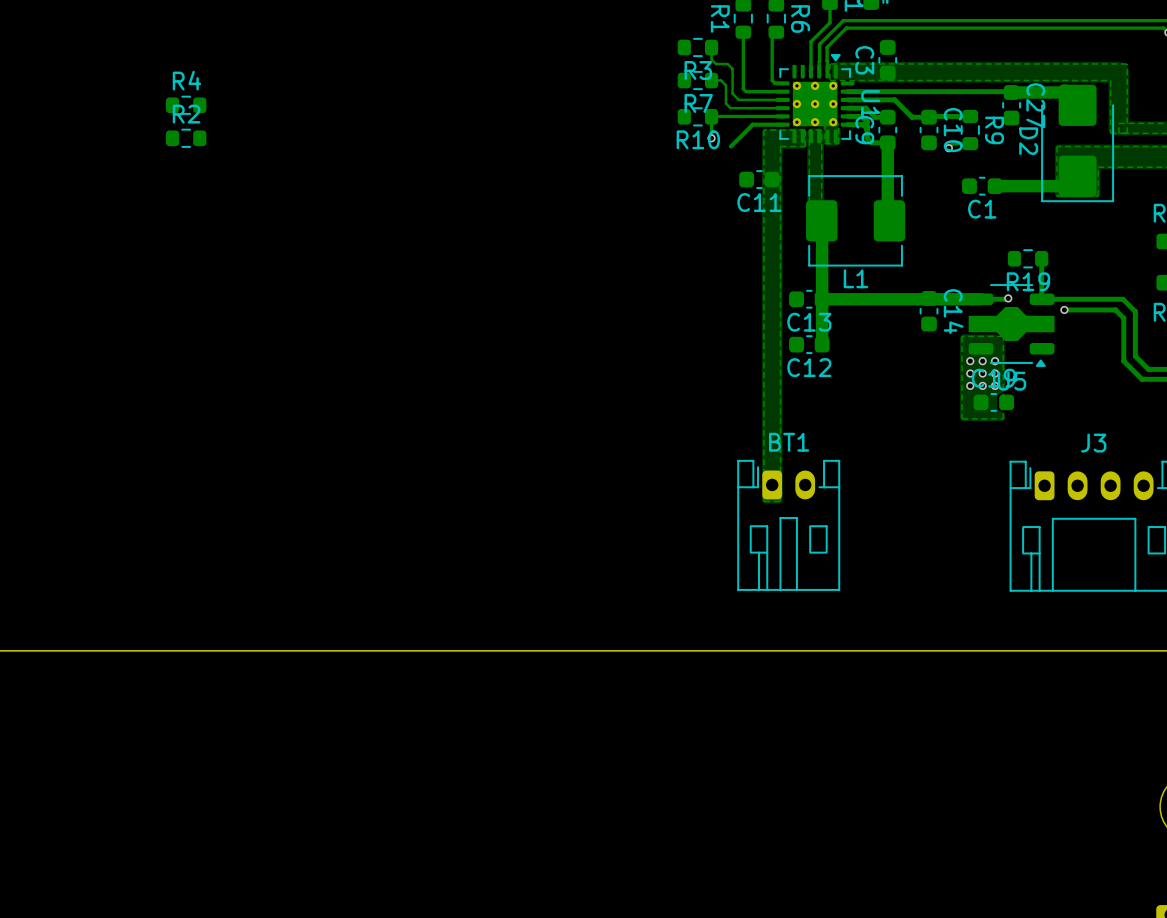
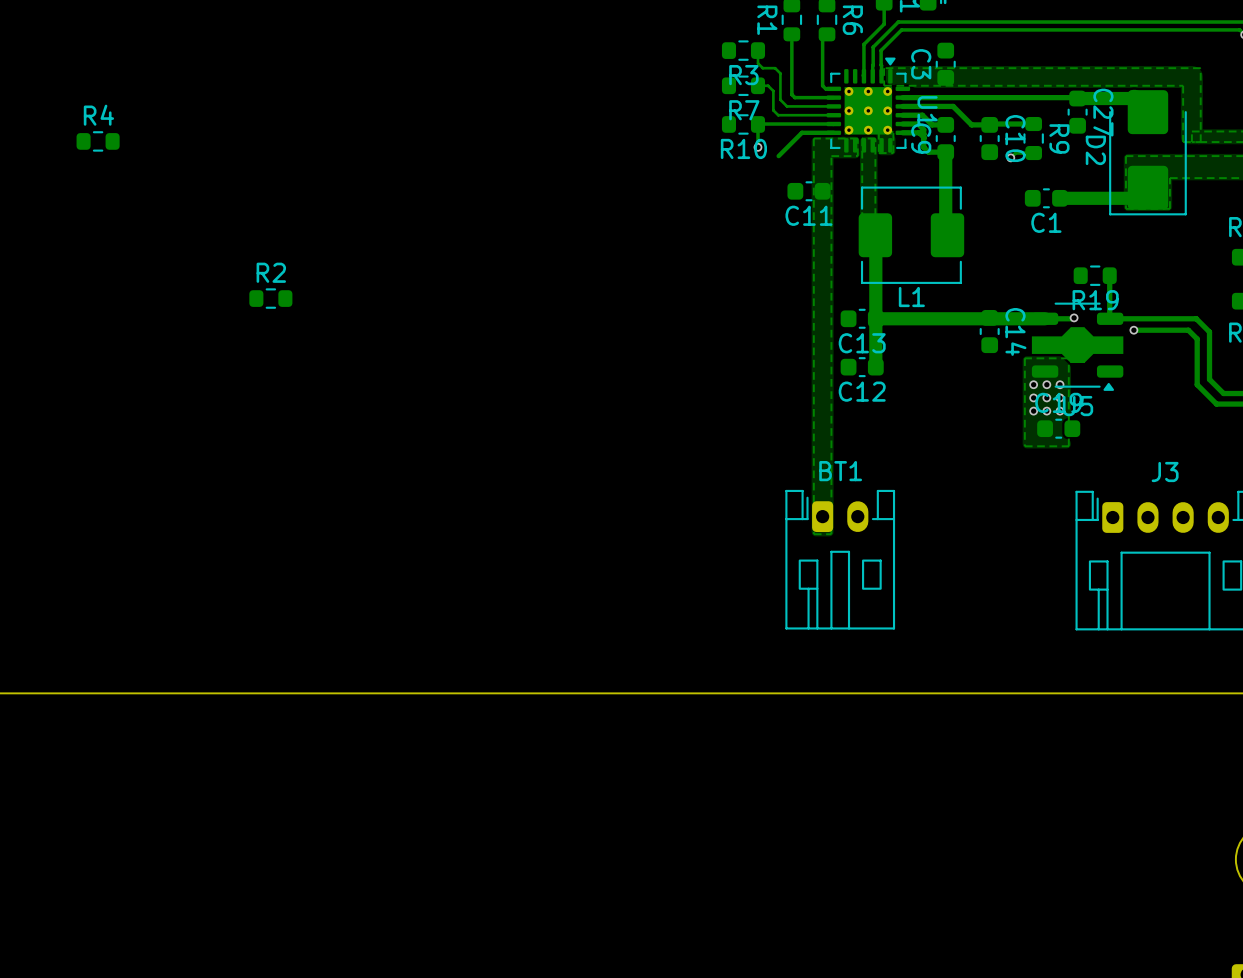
R4 position: (186, 105) -> (98, 141)
R2 position: (186, 138) -> (270, 298)

